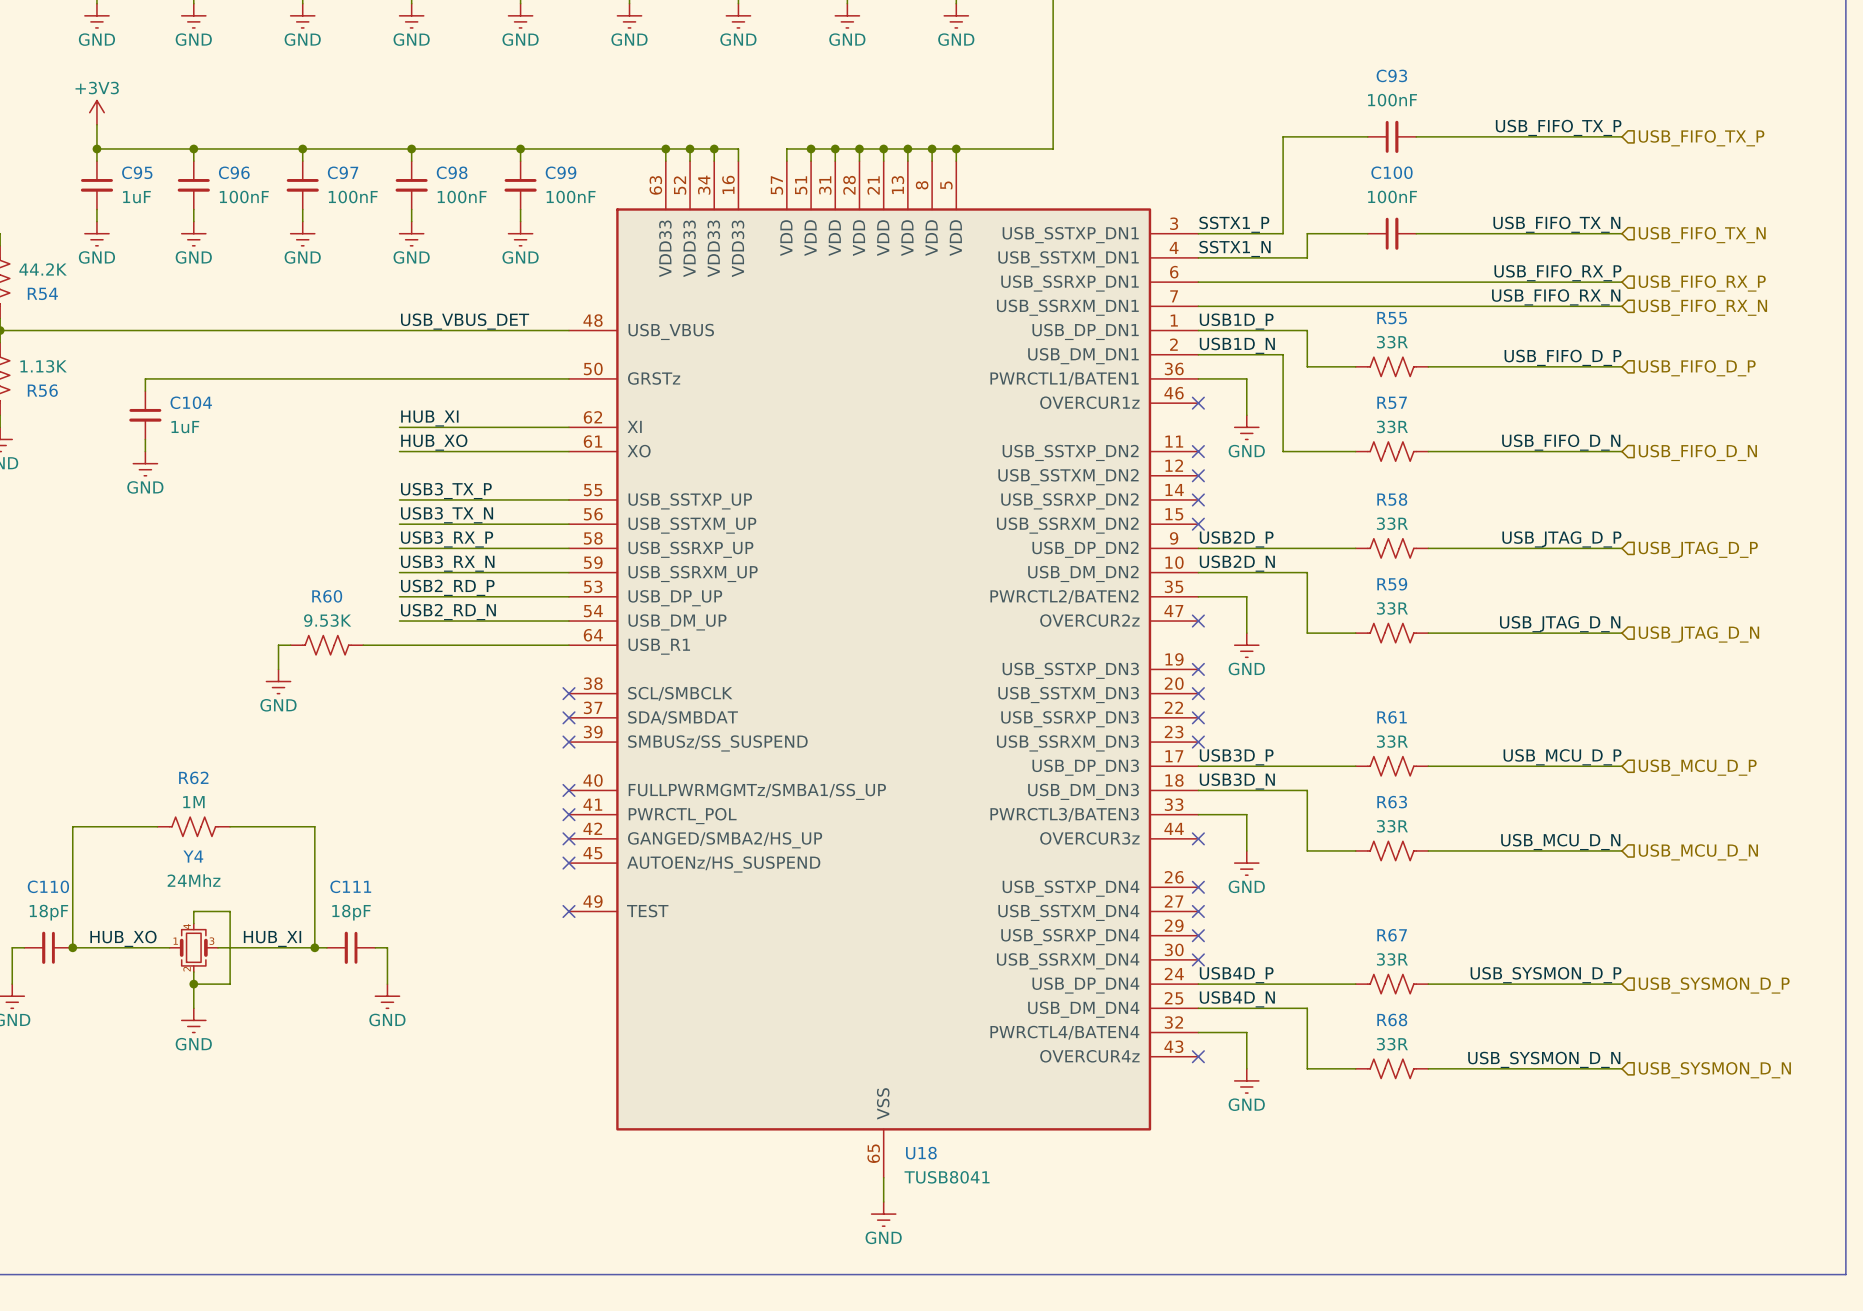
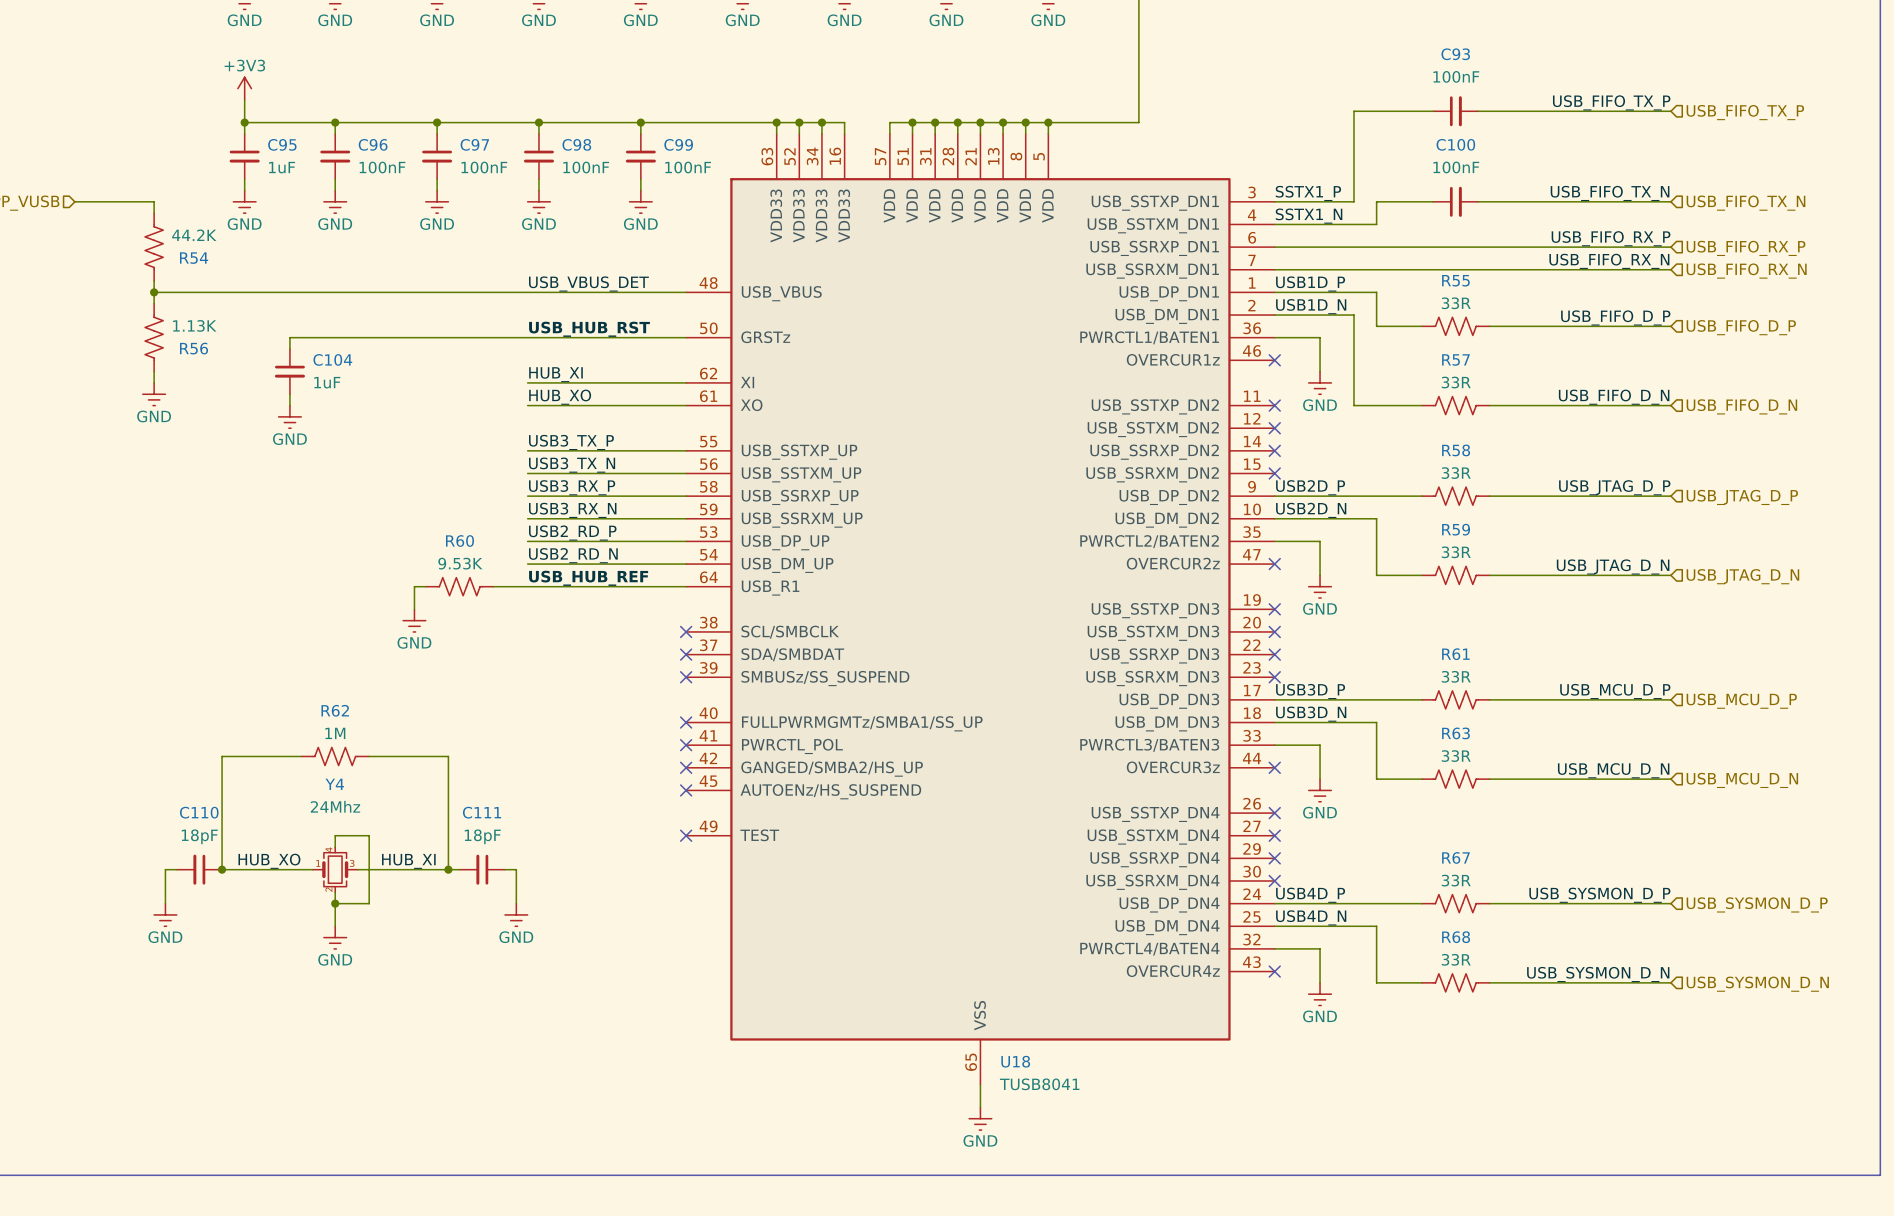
label: none -> USB_HUB_RST (589, 329)
label: none -> USB_HUB_REF (588, 578)

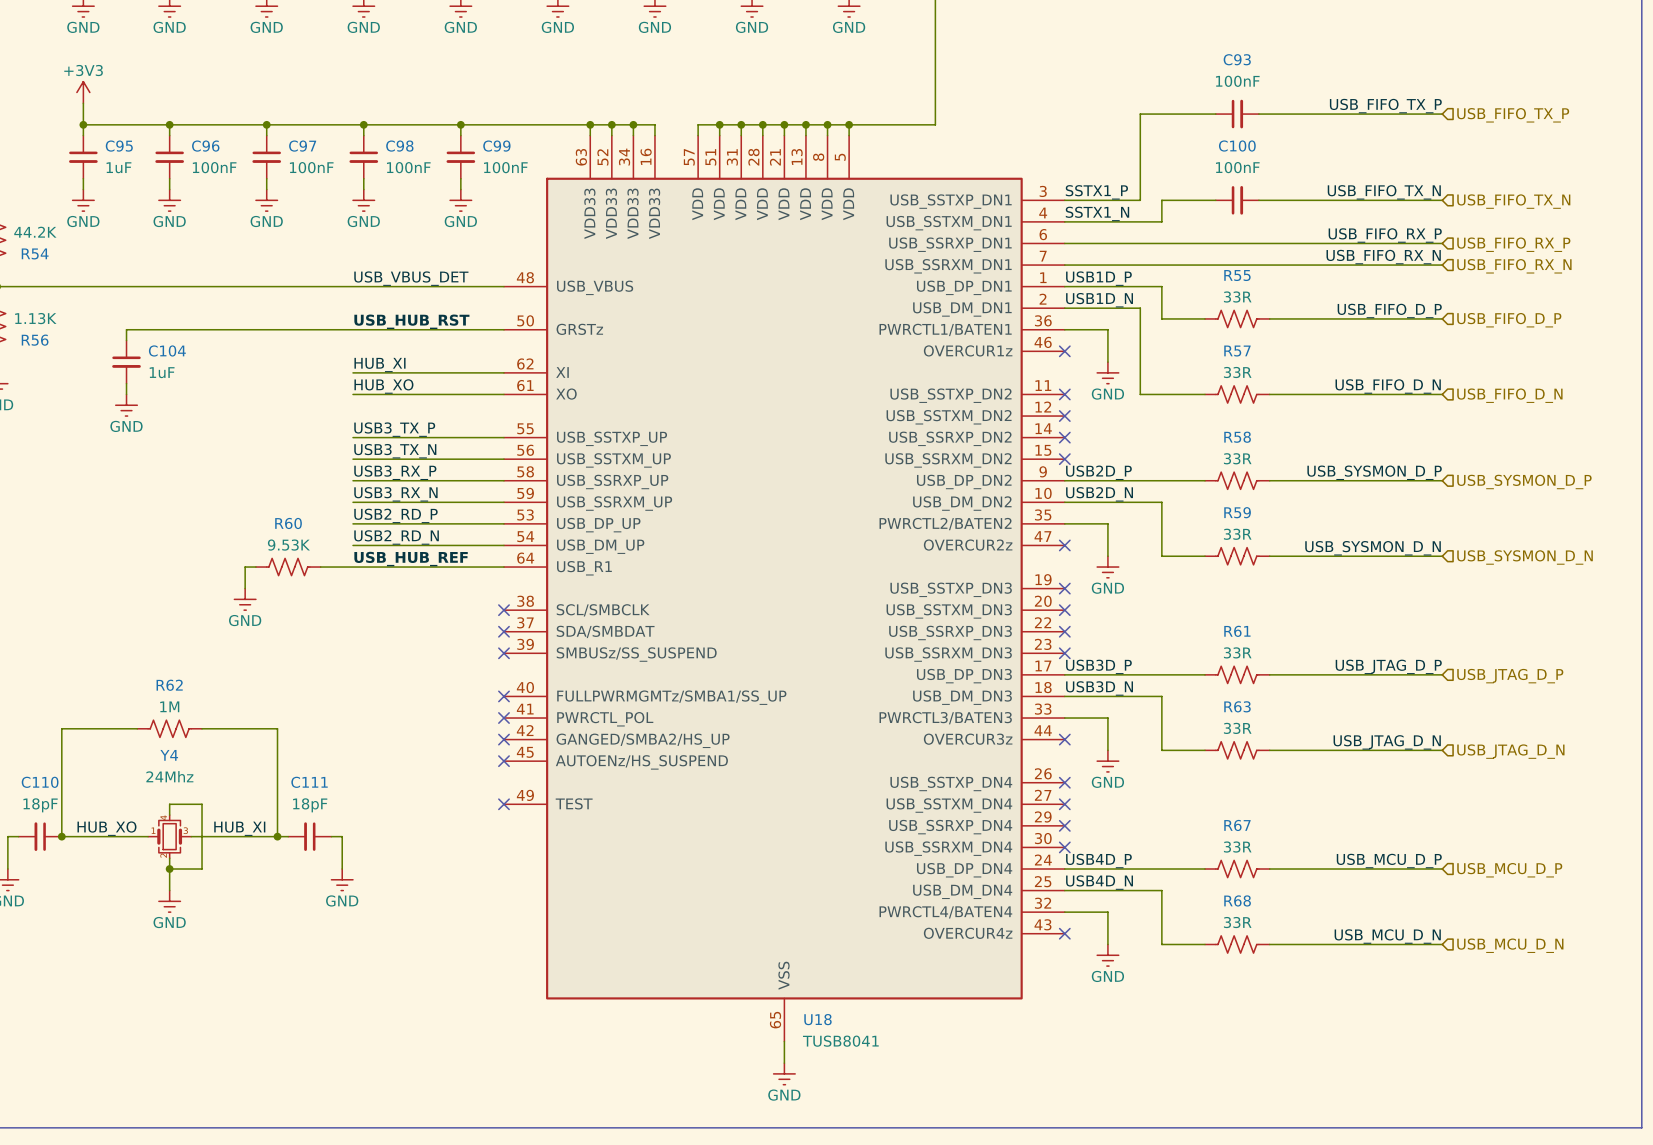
label: USB_JTAG_D_P (1614, 487) -> USB_SYSMON_D_P (1374, 472)
hierarchical label: USB_JTAG_D_P (1742, 497) -> USB_SYSMON_D_P (1524, 481)
label: USB_JTAG_D_N (1613, 567) -> USB_SYSMON_D_N (1373, 548)
hierarchical label: USB_JTAG_D_N (1742, 576) -> USB_SYSMON_D_N (1525, 557)
label: USB_MCU_D_P (1615, 691) -> USB_JTAG_D_P (1388, 666)
hierarchical label: USB_MCU_D_P (1741, 701) -> USB_JTAG_D_P (1510, 676)
label: USB_MCU_D_N (1613, 770) -> USB_JTAG_D_N (1387, 742)
hierarchical label: USB_MCU_D_N (1742, 780) -> USB_JTAG_D_N (1510, 751)
label: USB_SYSMON_D_P (1599, 895) -> USB_MCU_D_P (1389, 861)
hierarchical label: USB_SYSMON_D_P (1757, 904) -> USB_MCU_D_P (1509, 870)
label: USB_SYSMON_D_N (1598, 974) -> USB_MCU_D_N (1387, 936)
hierarchical label: USB_SYSMON_D_N (1757, 984) -> USB_MCU_D_N (1510, 945)

